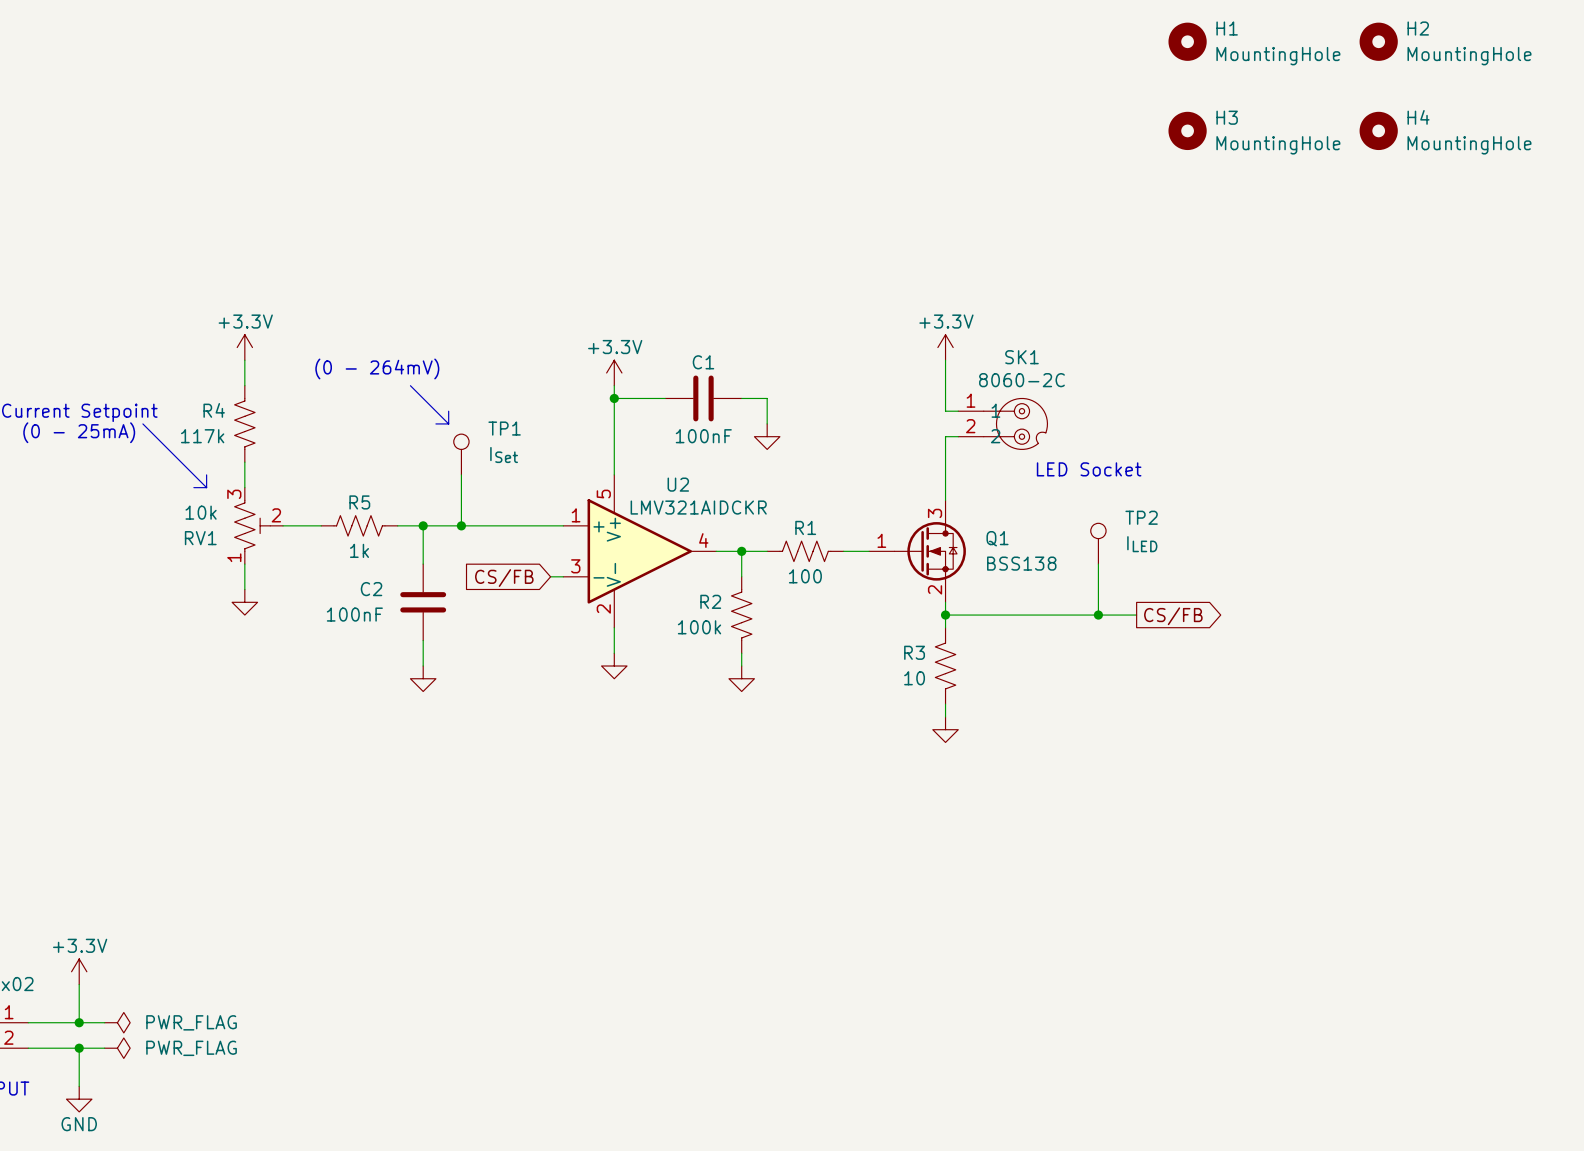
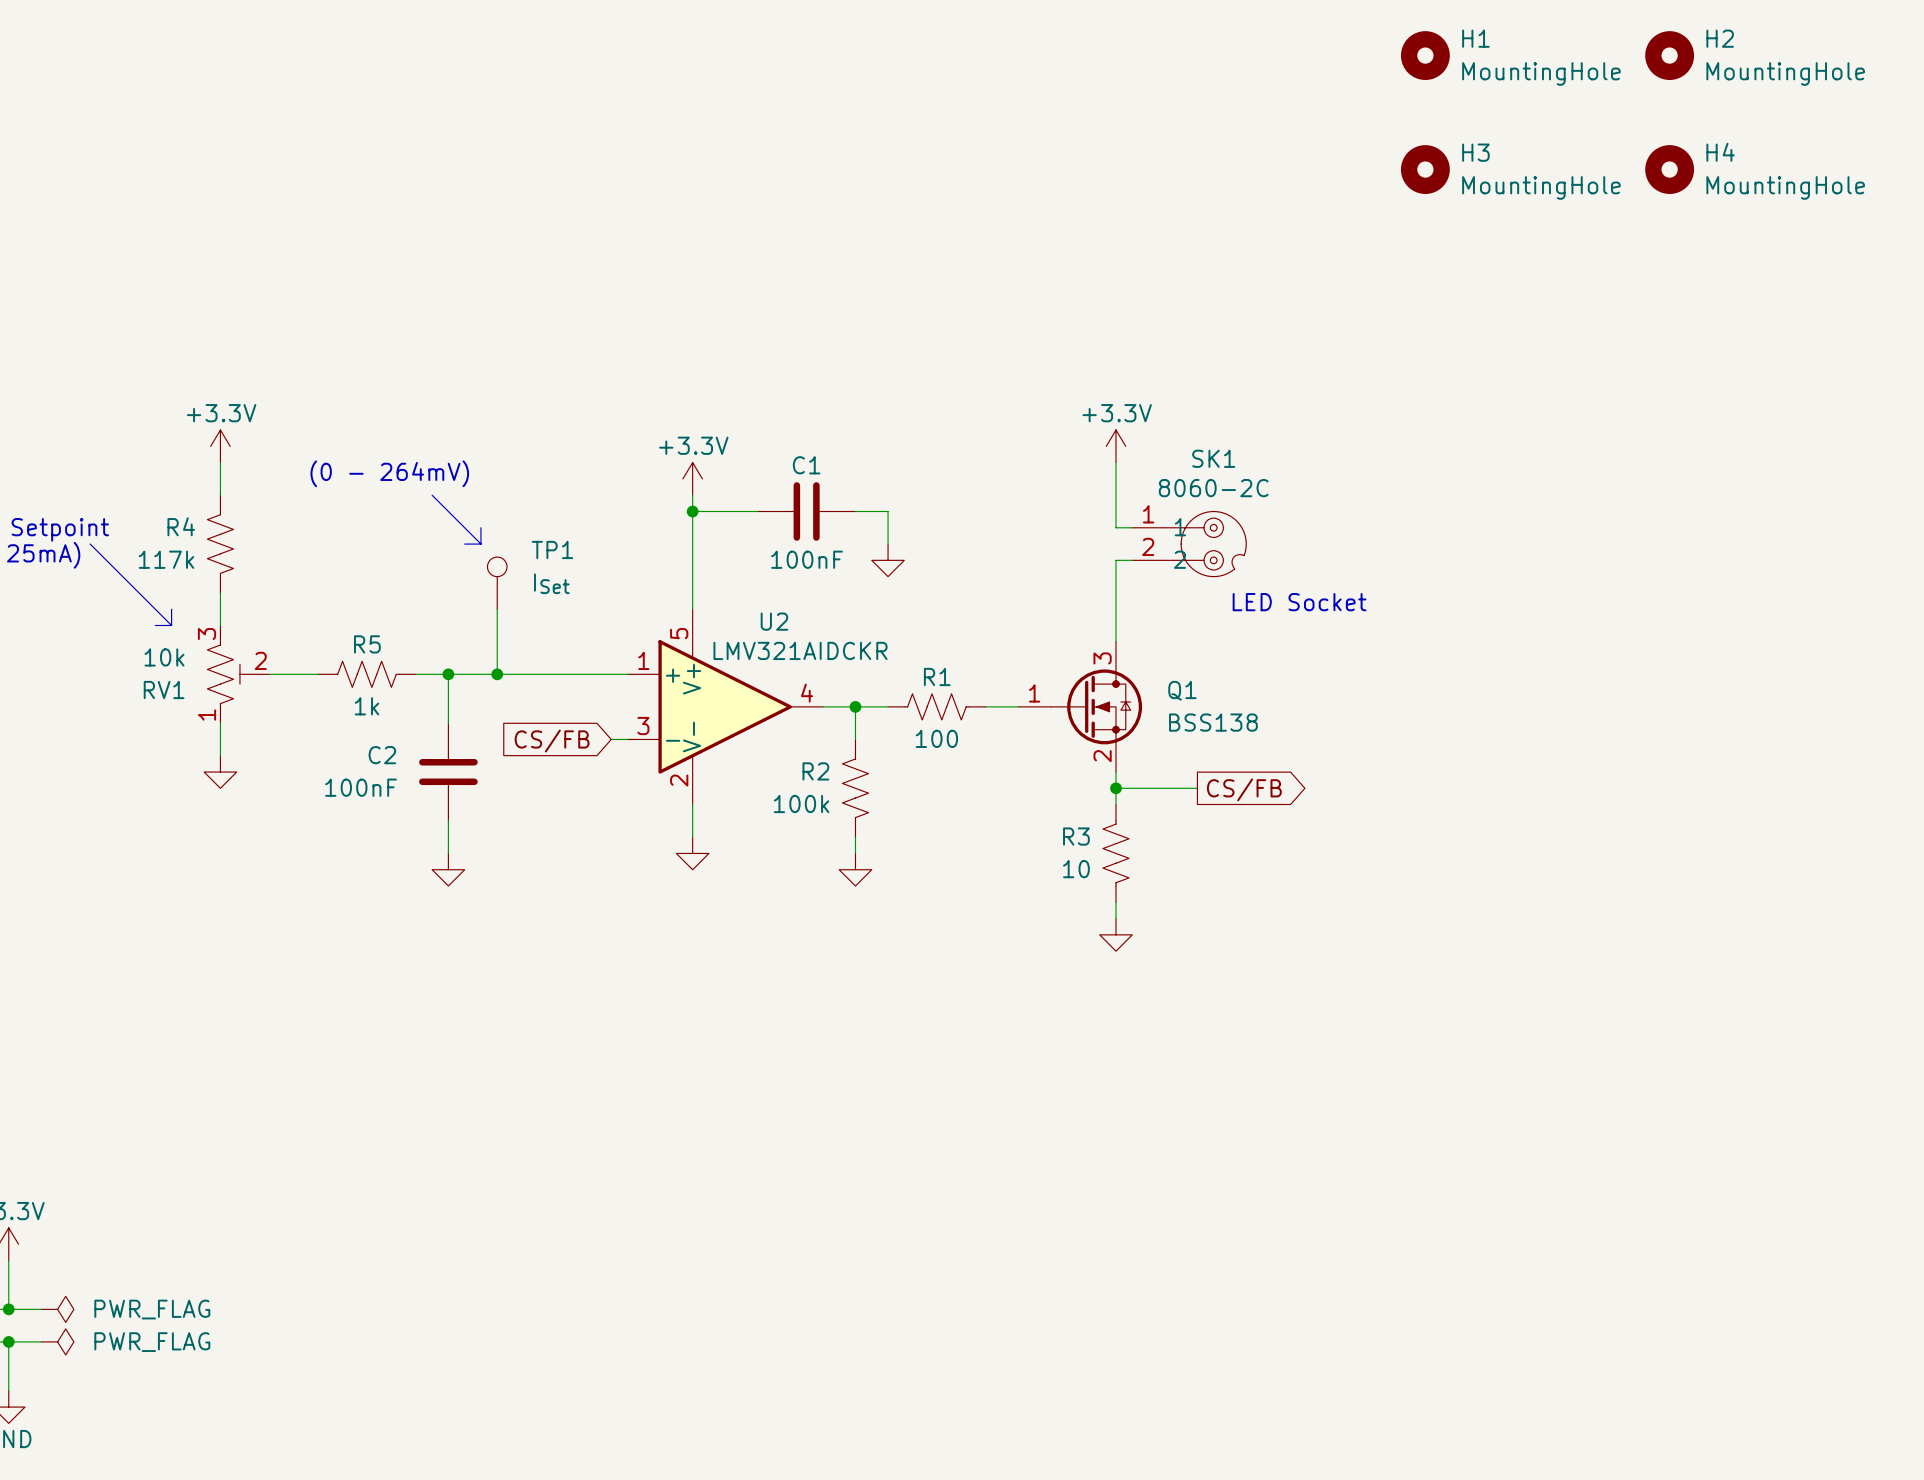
TP2: ILED (1098, 543) -> none
wire: (1098, 564) (1098, 615) -> none
wire: (1009, 615) (1136, 615) -> none
junction: (1098, 615) -> none
global label position: CS/FB (1173, 616) -> CS/FB (1244, 789)

